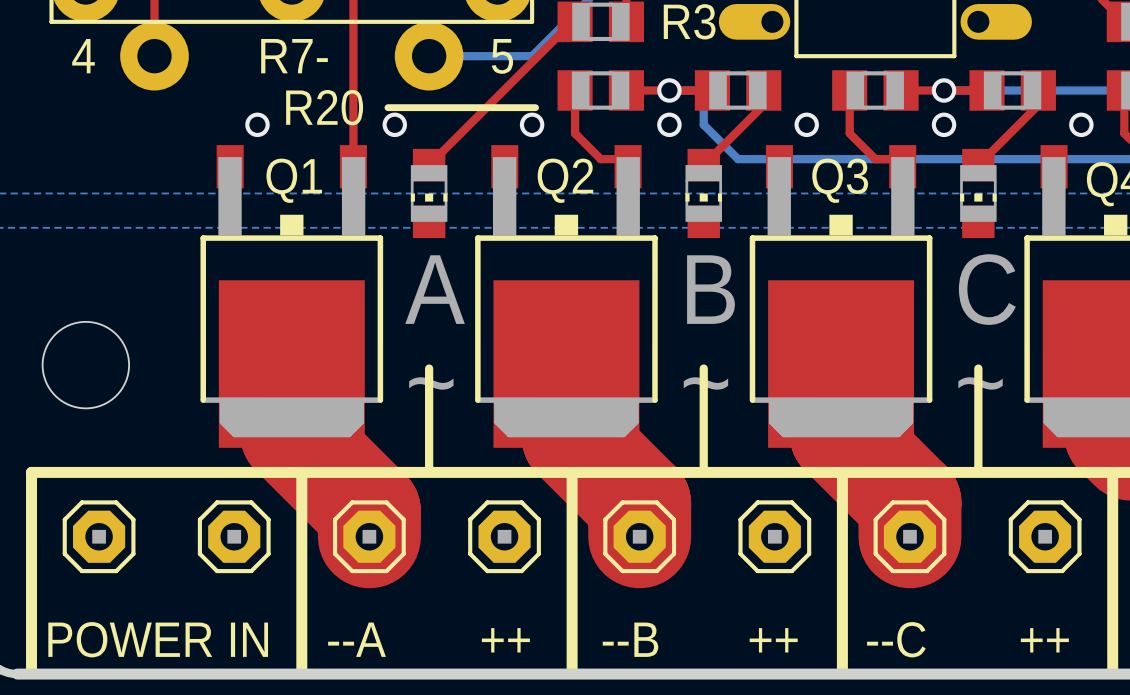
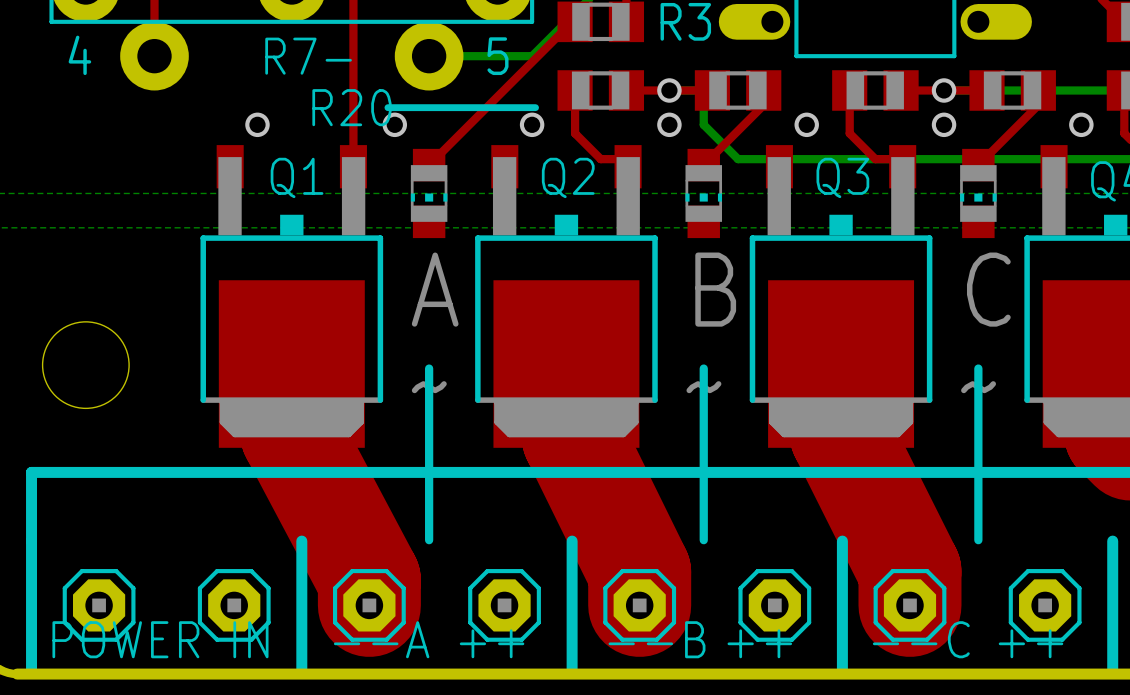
top track: (291, 433) (369, 511) (369, 536) -> (291, 433) (369, 580) (369, 605)
top track: (841, 433) (909, 502) (909, 536) -> (841, 433) (909, 571) (909, 605)
top track: (573, 437) (639, 503) (639, 536) -> (573, 437) (639, 572) (639, 605)
line: (301, 472) (301, 541) -> (429, 471) (429, 540)
line: (572, 472) (572, 541) -> (703, 471) (703, 540)
line: (842, 472) (842, 541) -> none
line: (1112, 472) (1112, 541) -> (978, 471) (978, 540)
part position: (99, 536) -> (99, 605)
part position: (234, 536) -> (234, 605)
part position: (369, 536) -> (369, 605)
part position: (504, 536) -> (504, 605)
part position: (639, 536) -> (639, 605)
part position: (774, 536) -> (774, 605)
part position: (909, 536) -> (909, 605)
part position: (1045, 536) -> (1045, 605)

